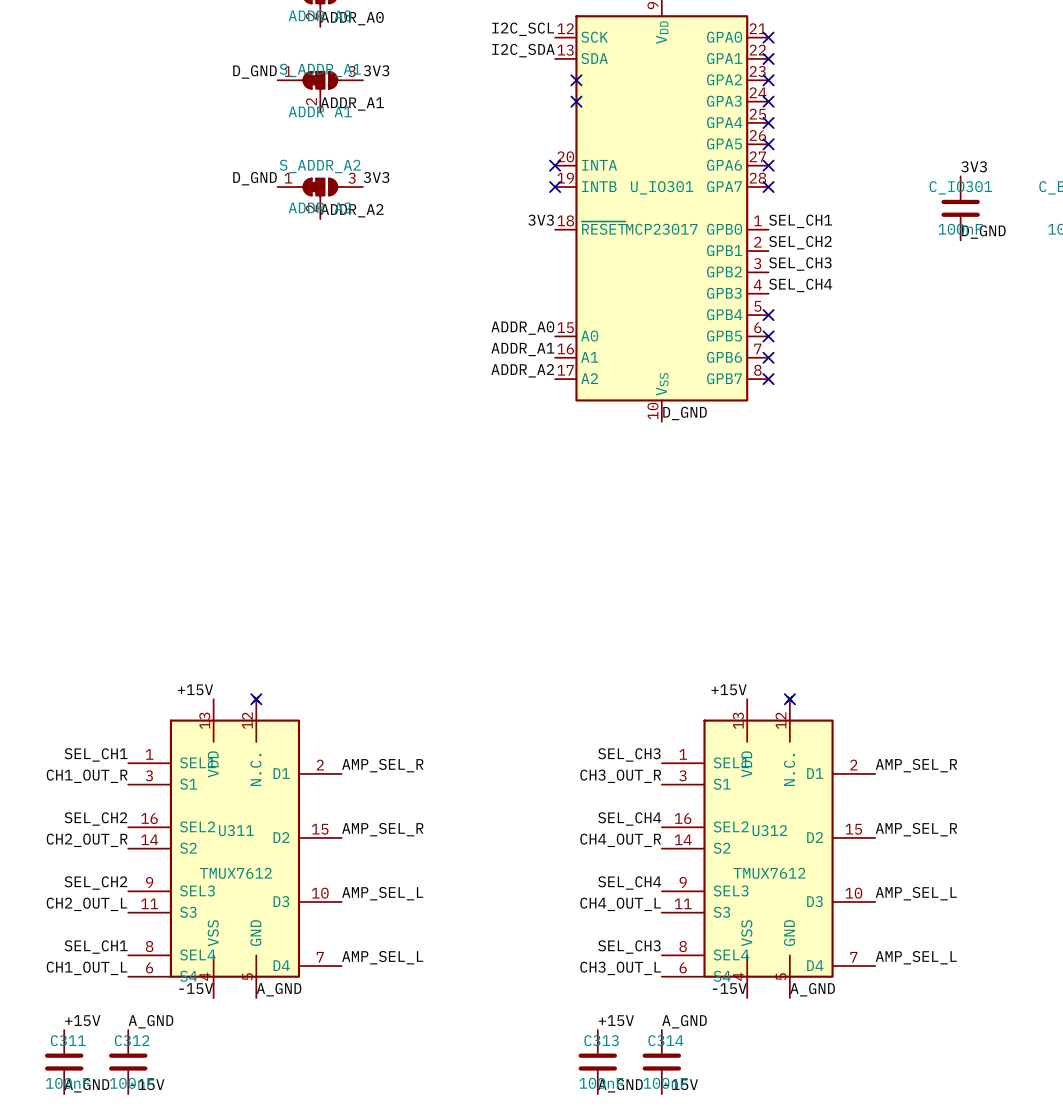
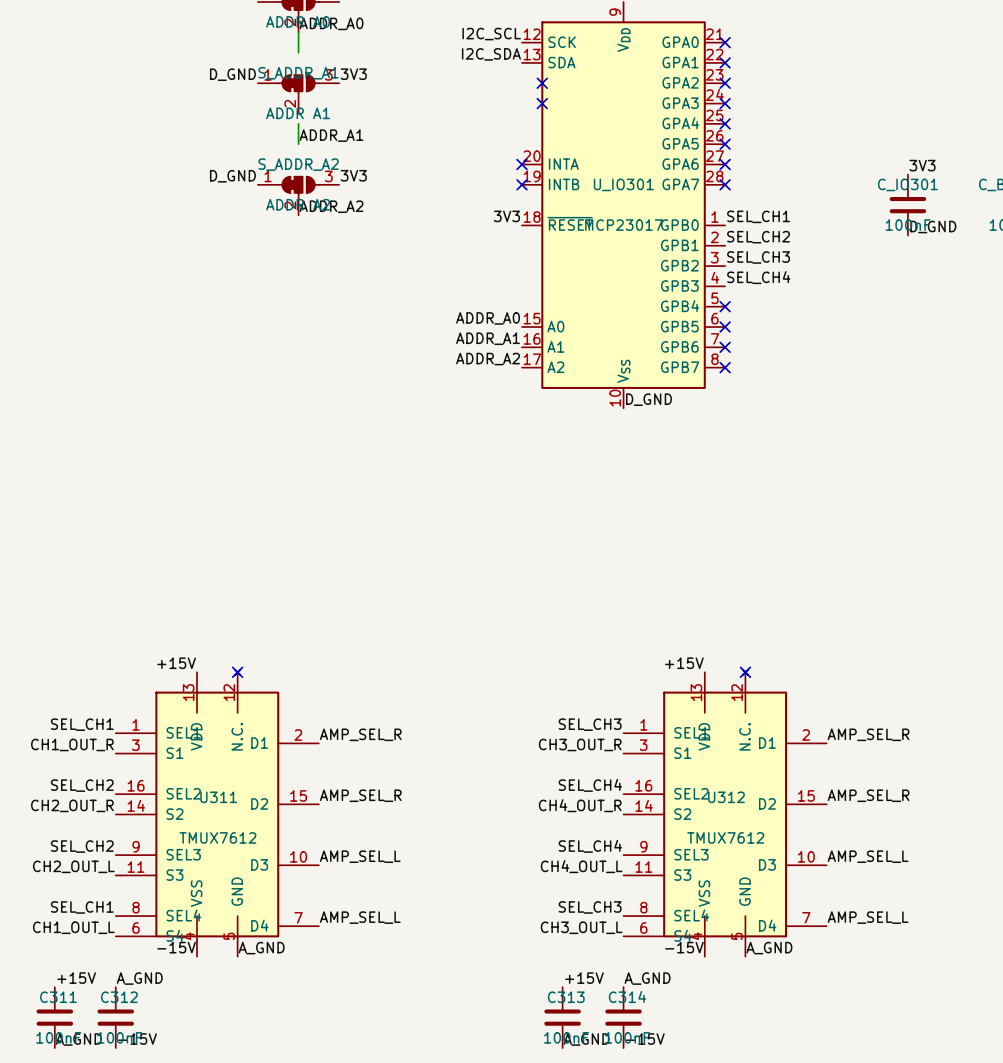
wire: none -> (298, 32) (298, 52)
label position: ADDR_A1 (352, 104) -> ADDR_A1 (331, 135)
wire: none -> (298, 123) (298, 144)

